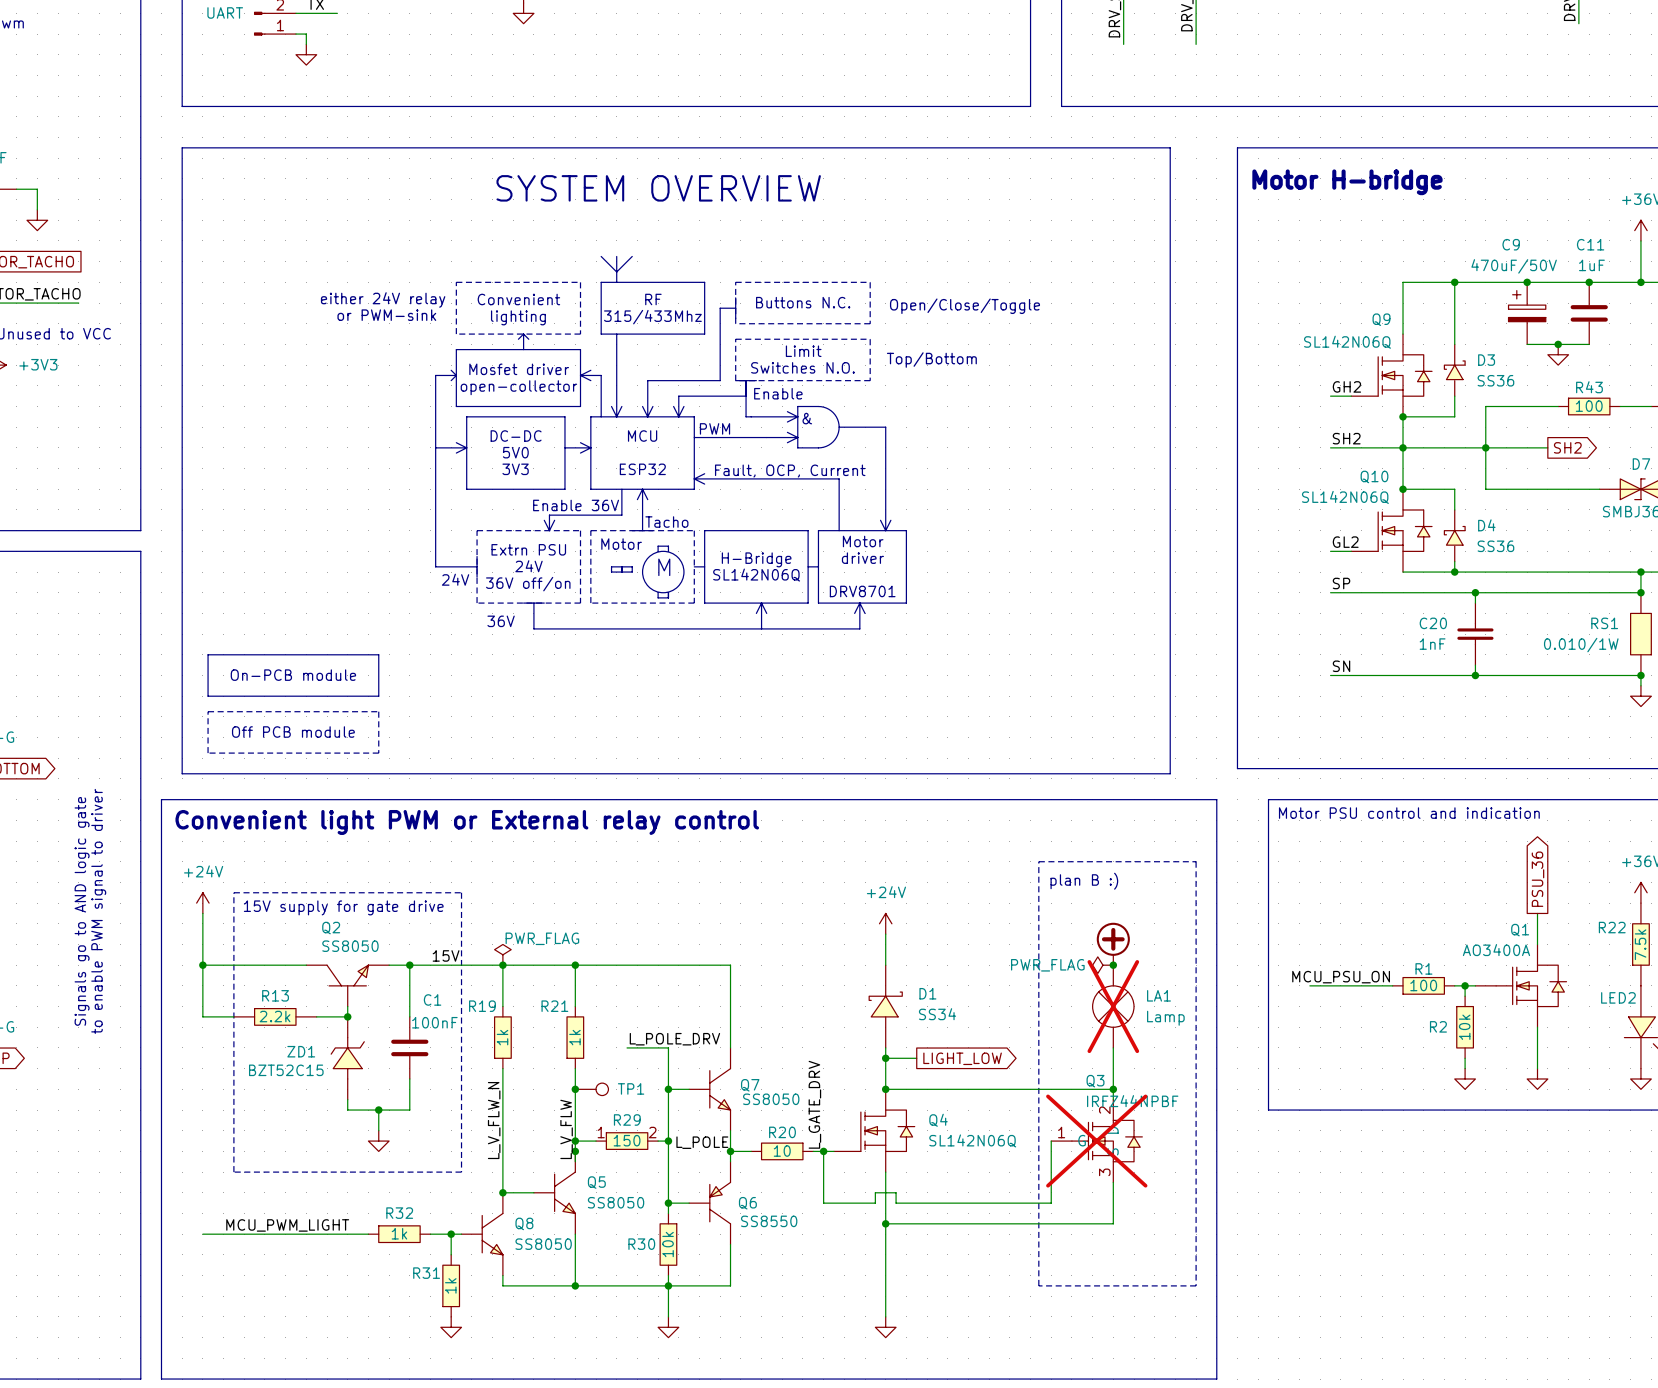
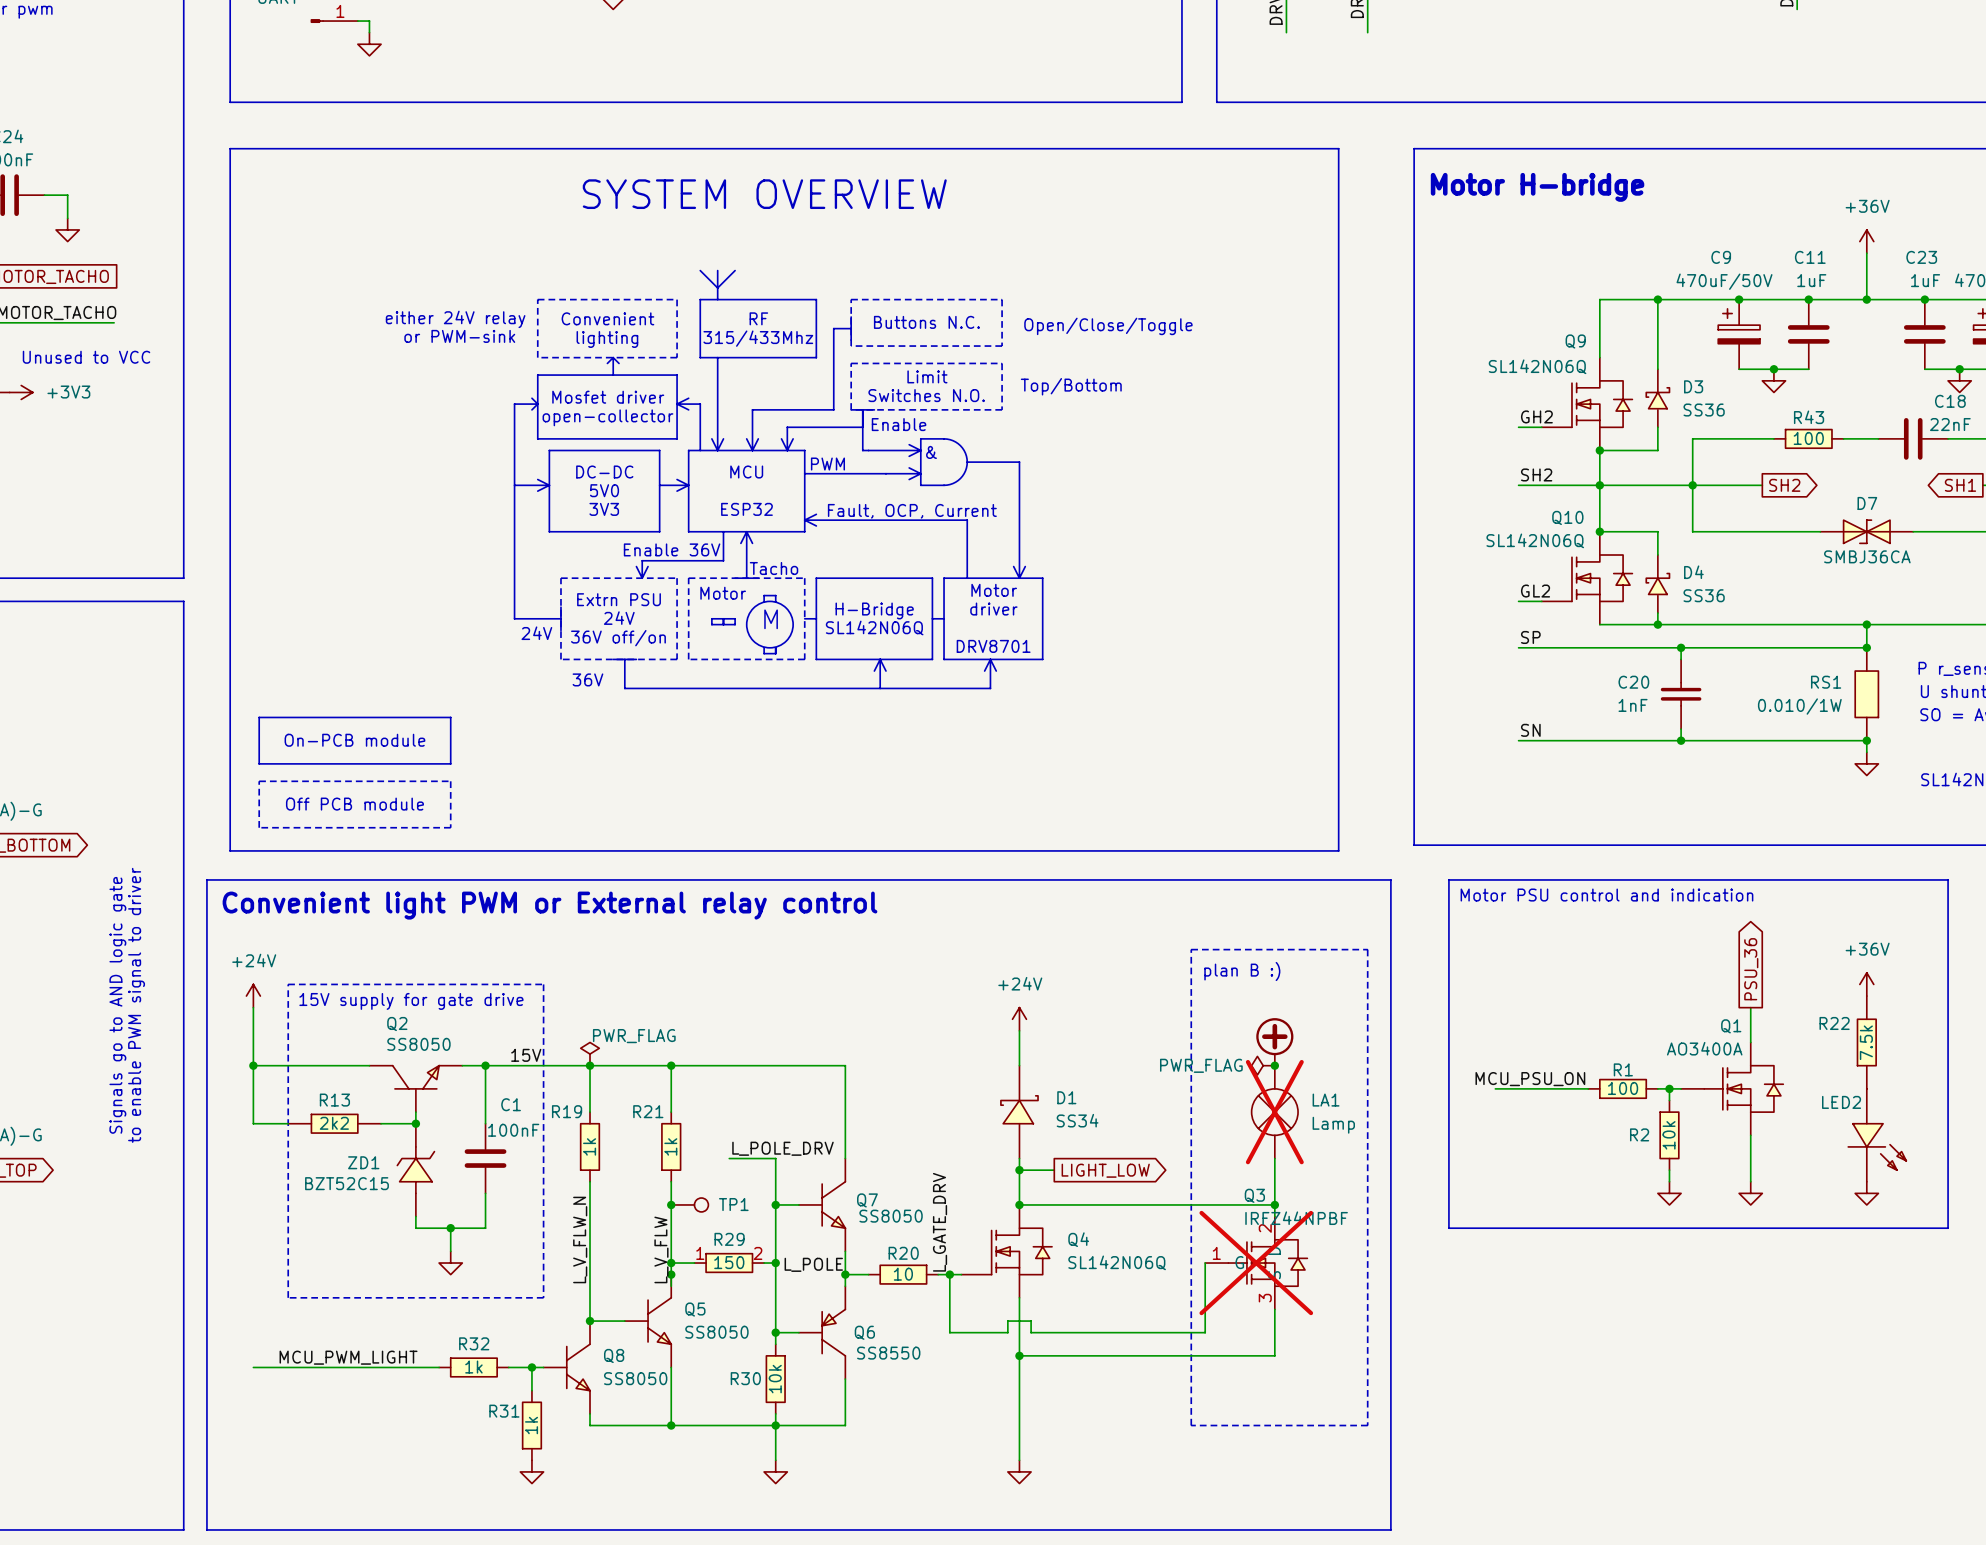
R13 value: 2.2k (275, 1016) -> 2k2 (334, 1123)

